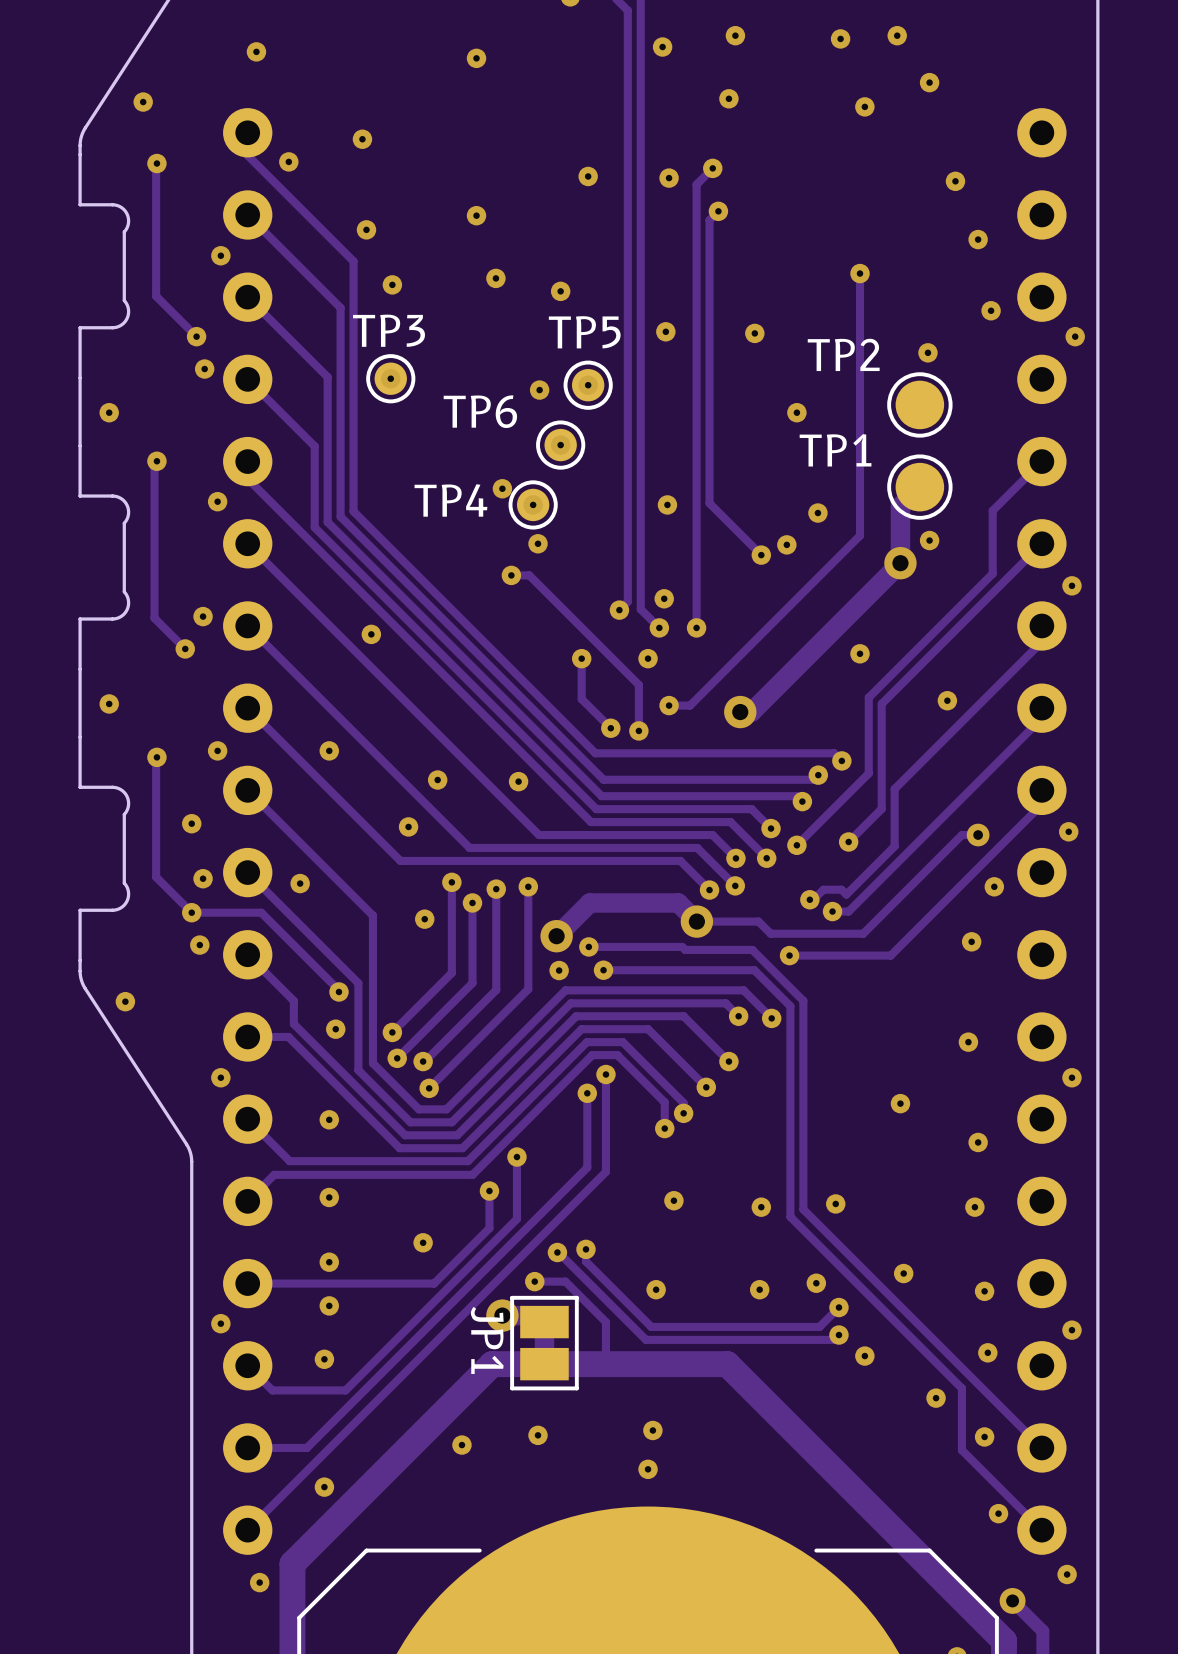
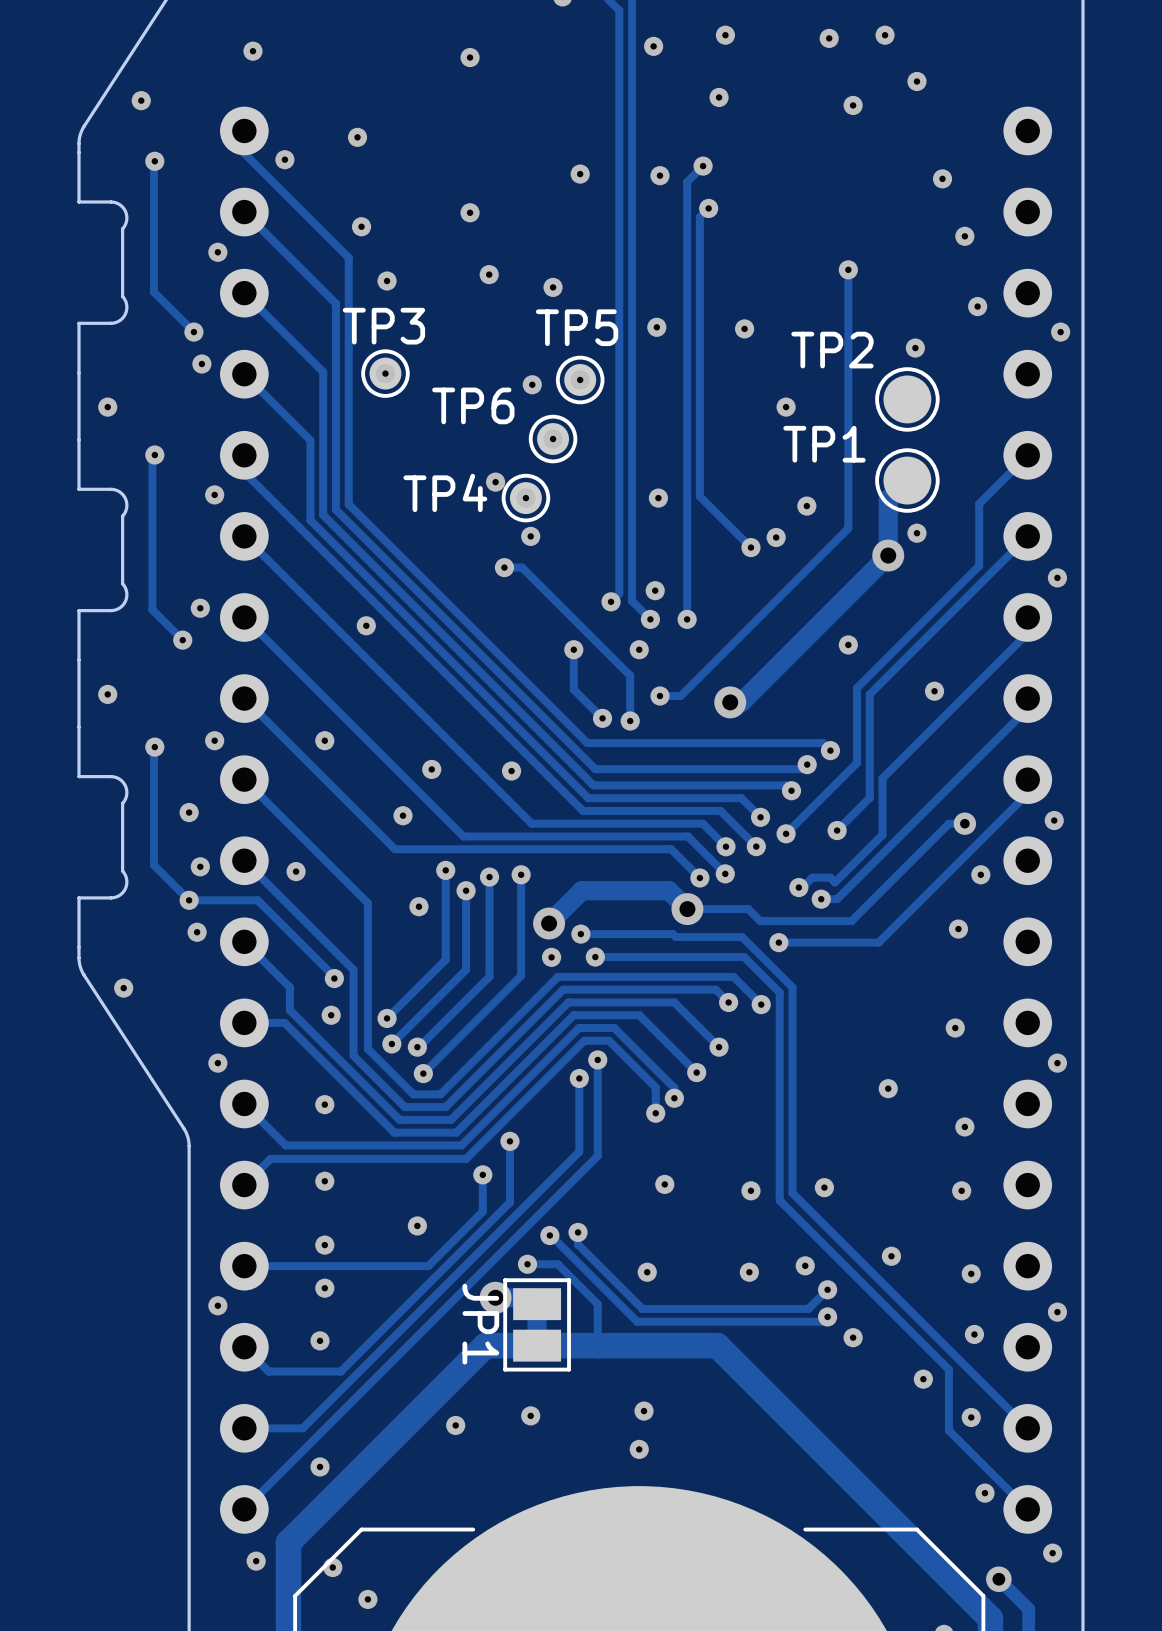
via: none -> (332, 1567)
via: none -> (367, 1599)

